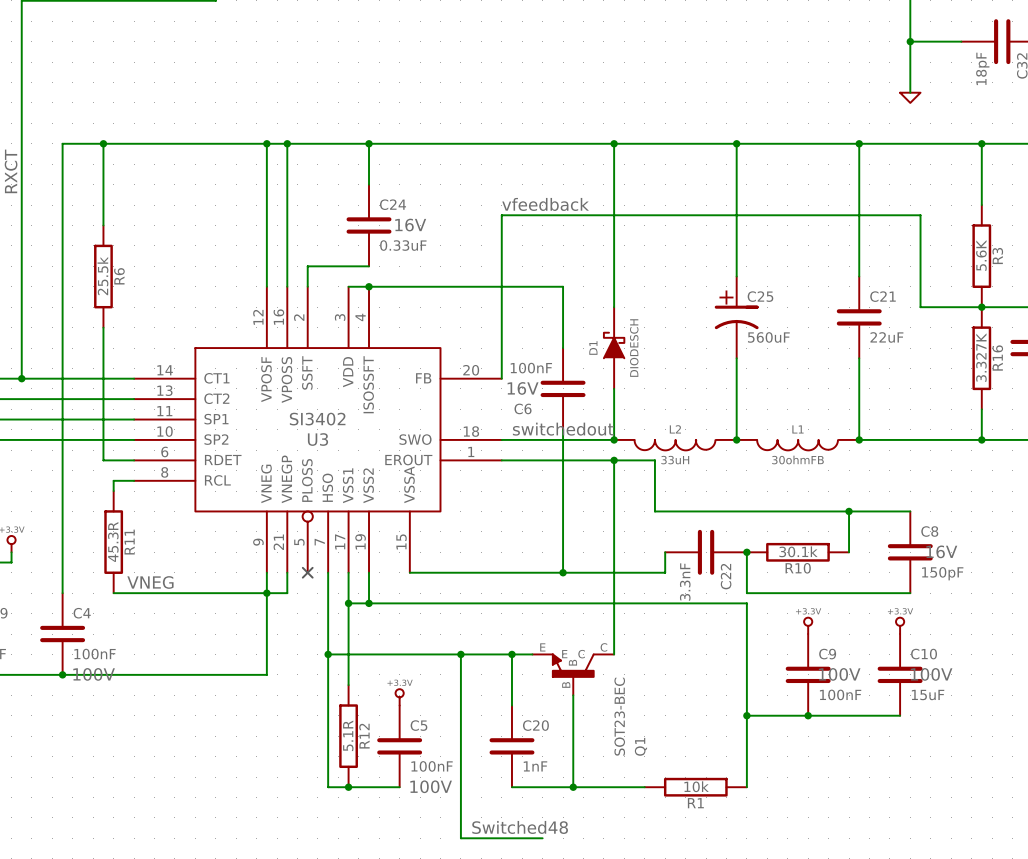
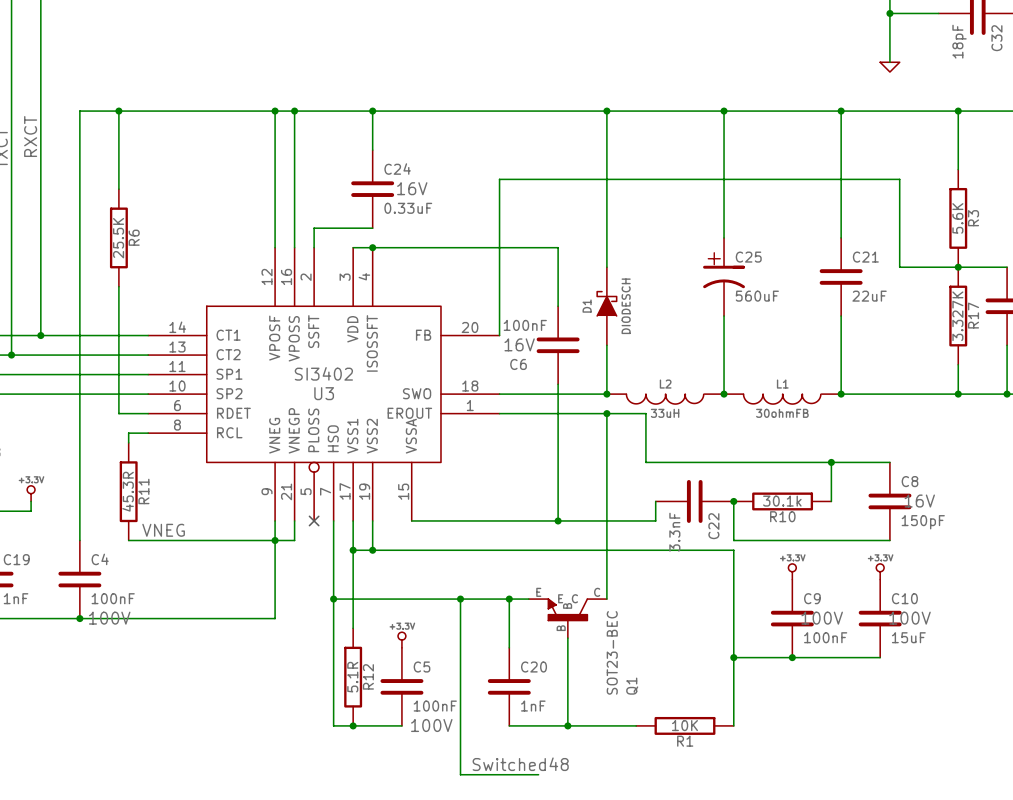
label: vfeedback (545, 204) -> none
R6 value: 25.5k (102, 276) -> 25.5K (118, 238)
R16 name: R16 (997, 358) -> R17 (973, 315)
label: switchedout (563, 429) -> none
R1 value: 10k (696, 786) -> 10K (684, 725)

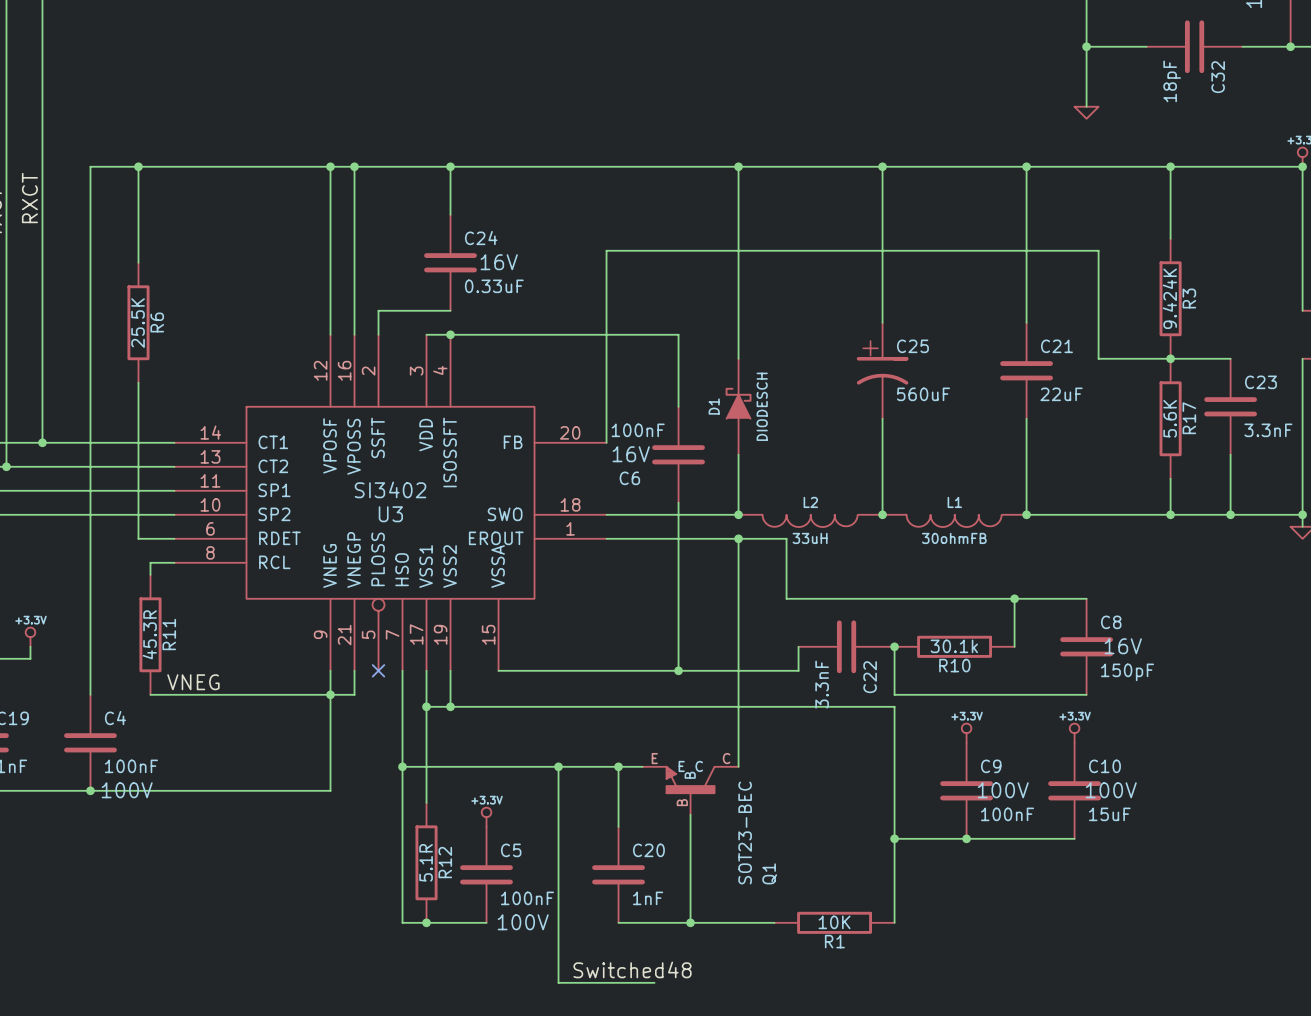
R3 value: 5.6K (957, 218) -> 9.424K (1169, 298)
R17 value: 3.327K (957, 316) -> 5.6K (1170, 418)

